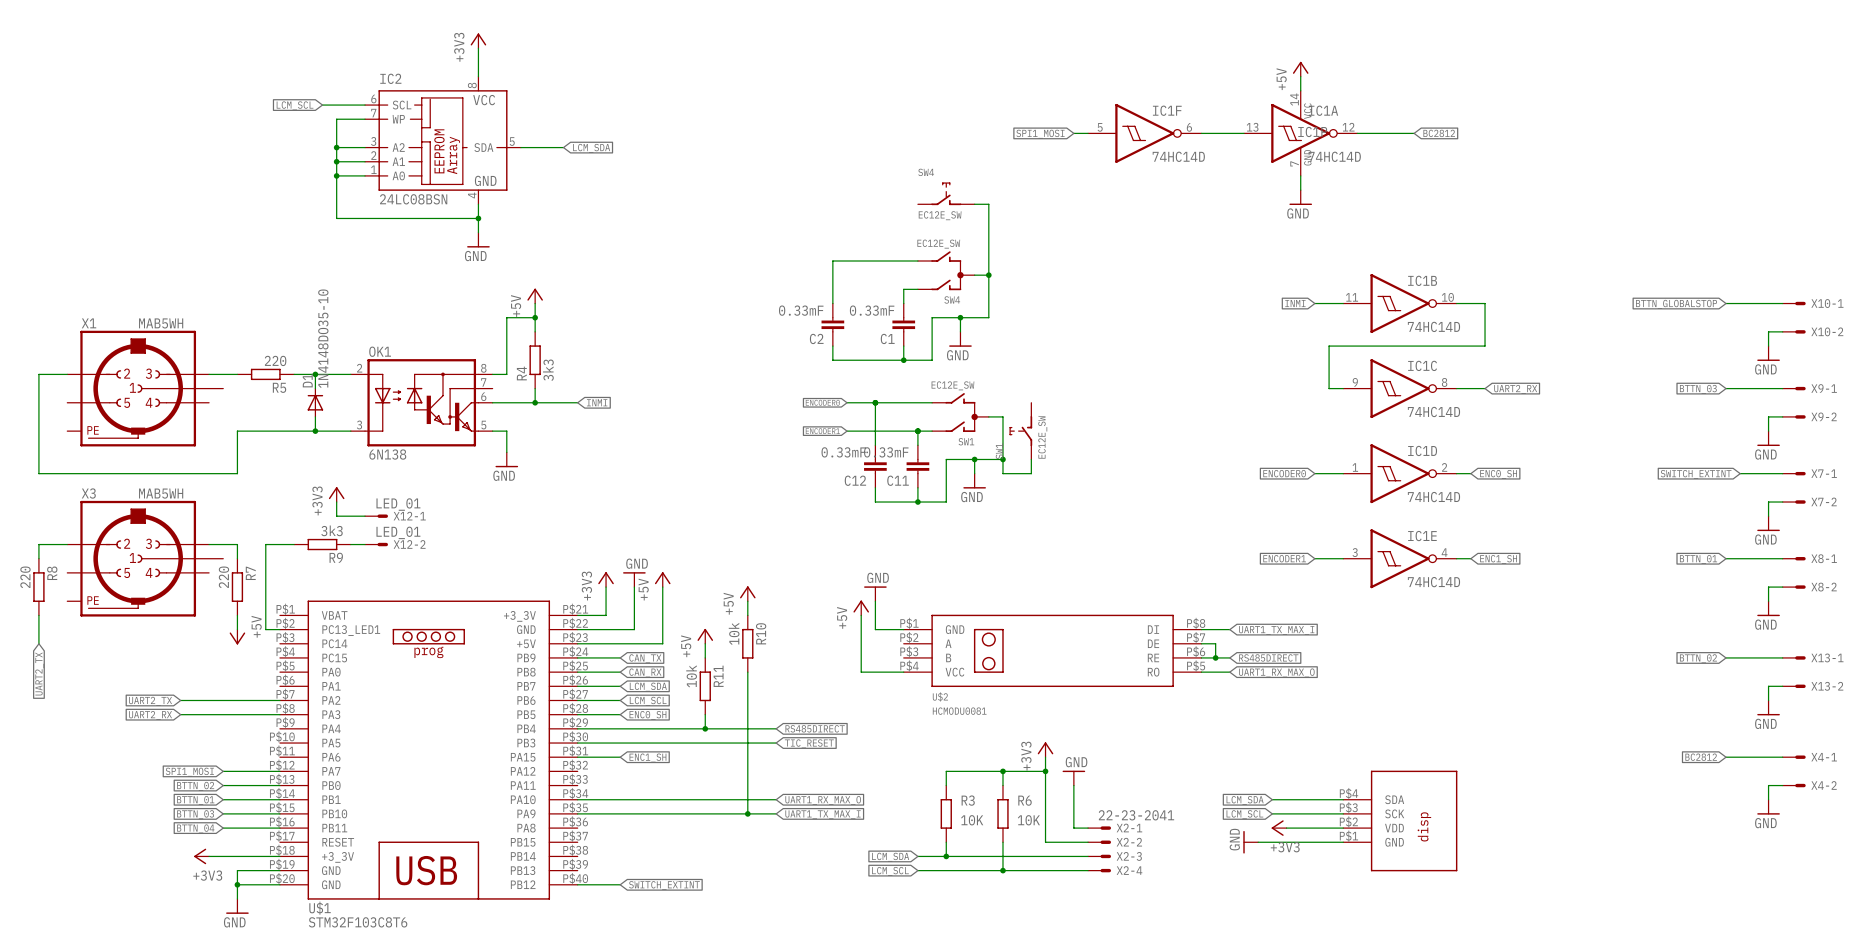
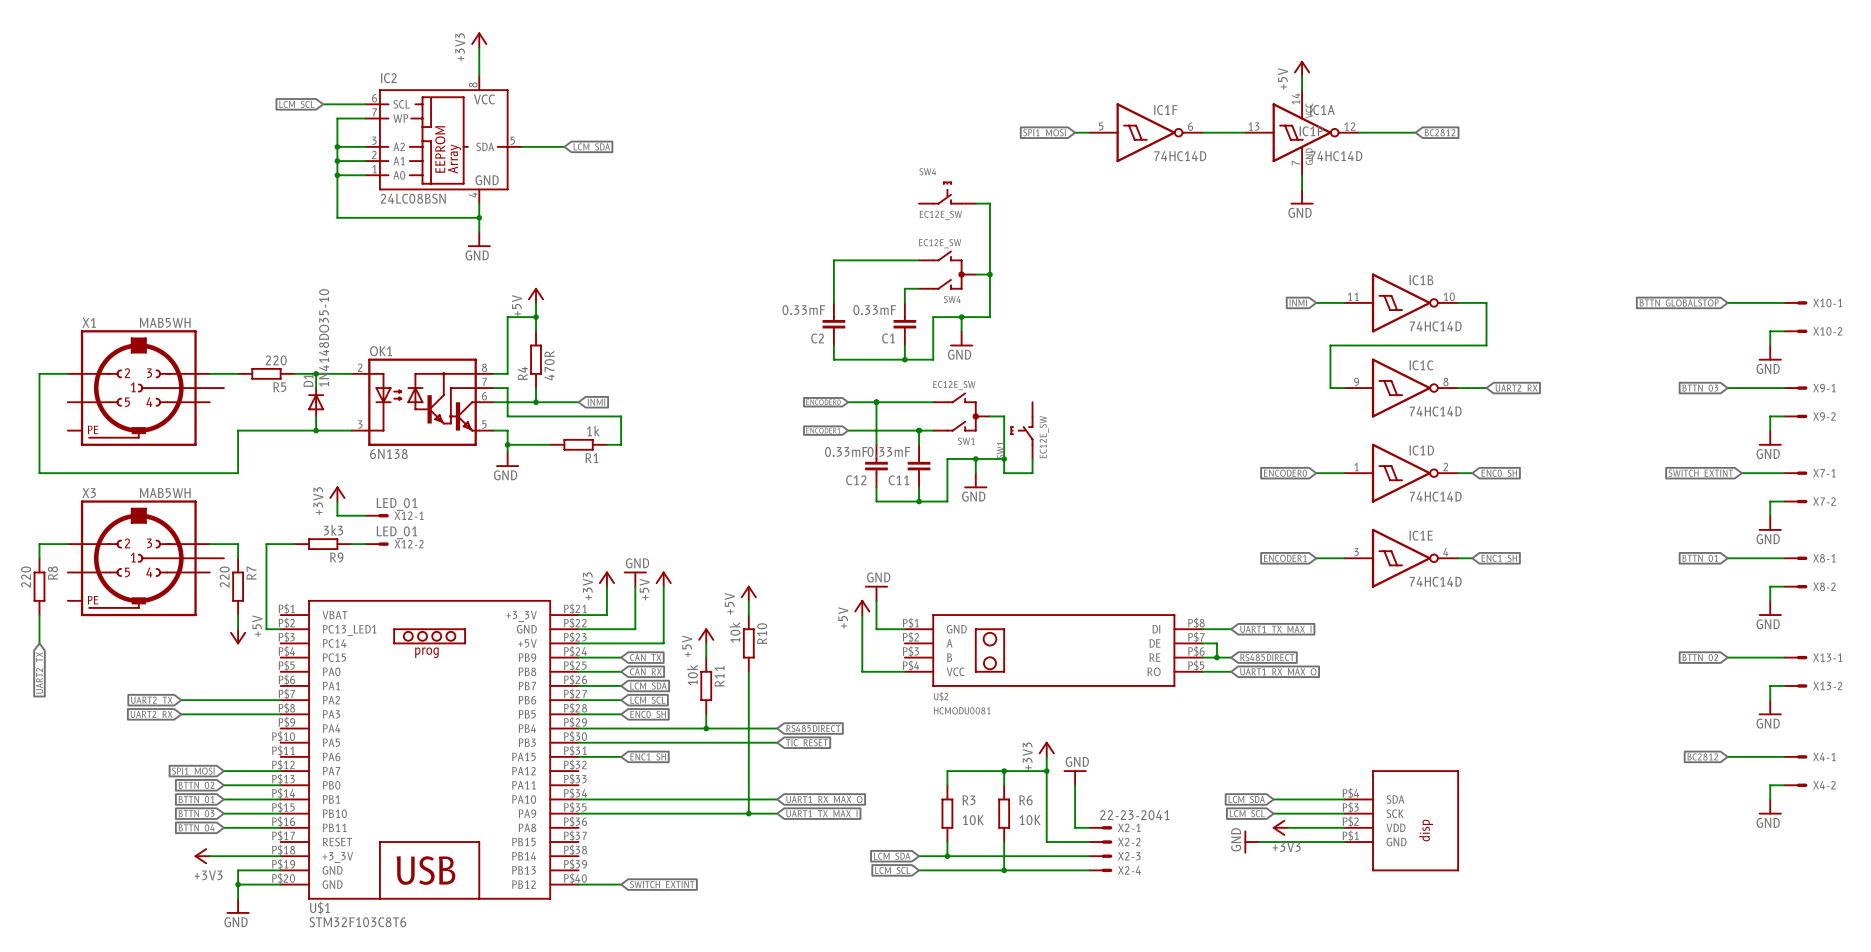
R4 value: 3k3 (548, 370) -> 470R (549, 365)
wire: none -> (493, 388) (507, 388) (507, 416) (621, 416) (621, 444) (606, 444)
wire: none -> (507, 444) (550, 444)
junction: none -> (507, 444)
R1: none -> 1k (578, 444)

